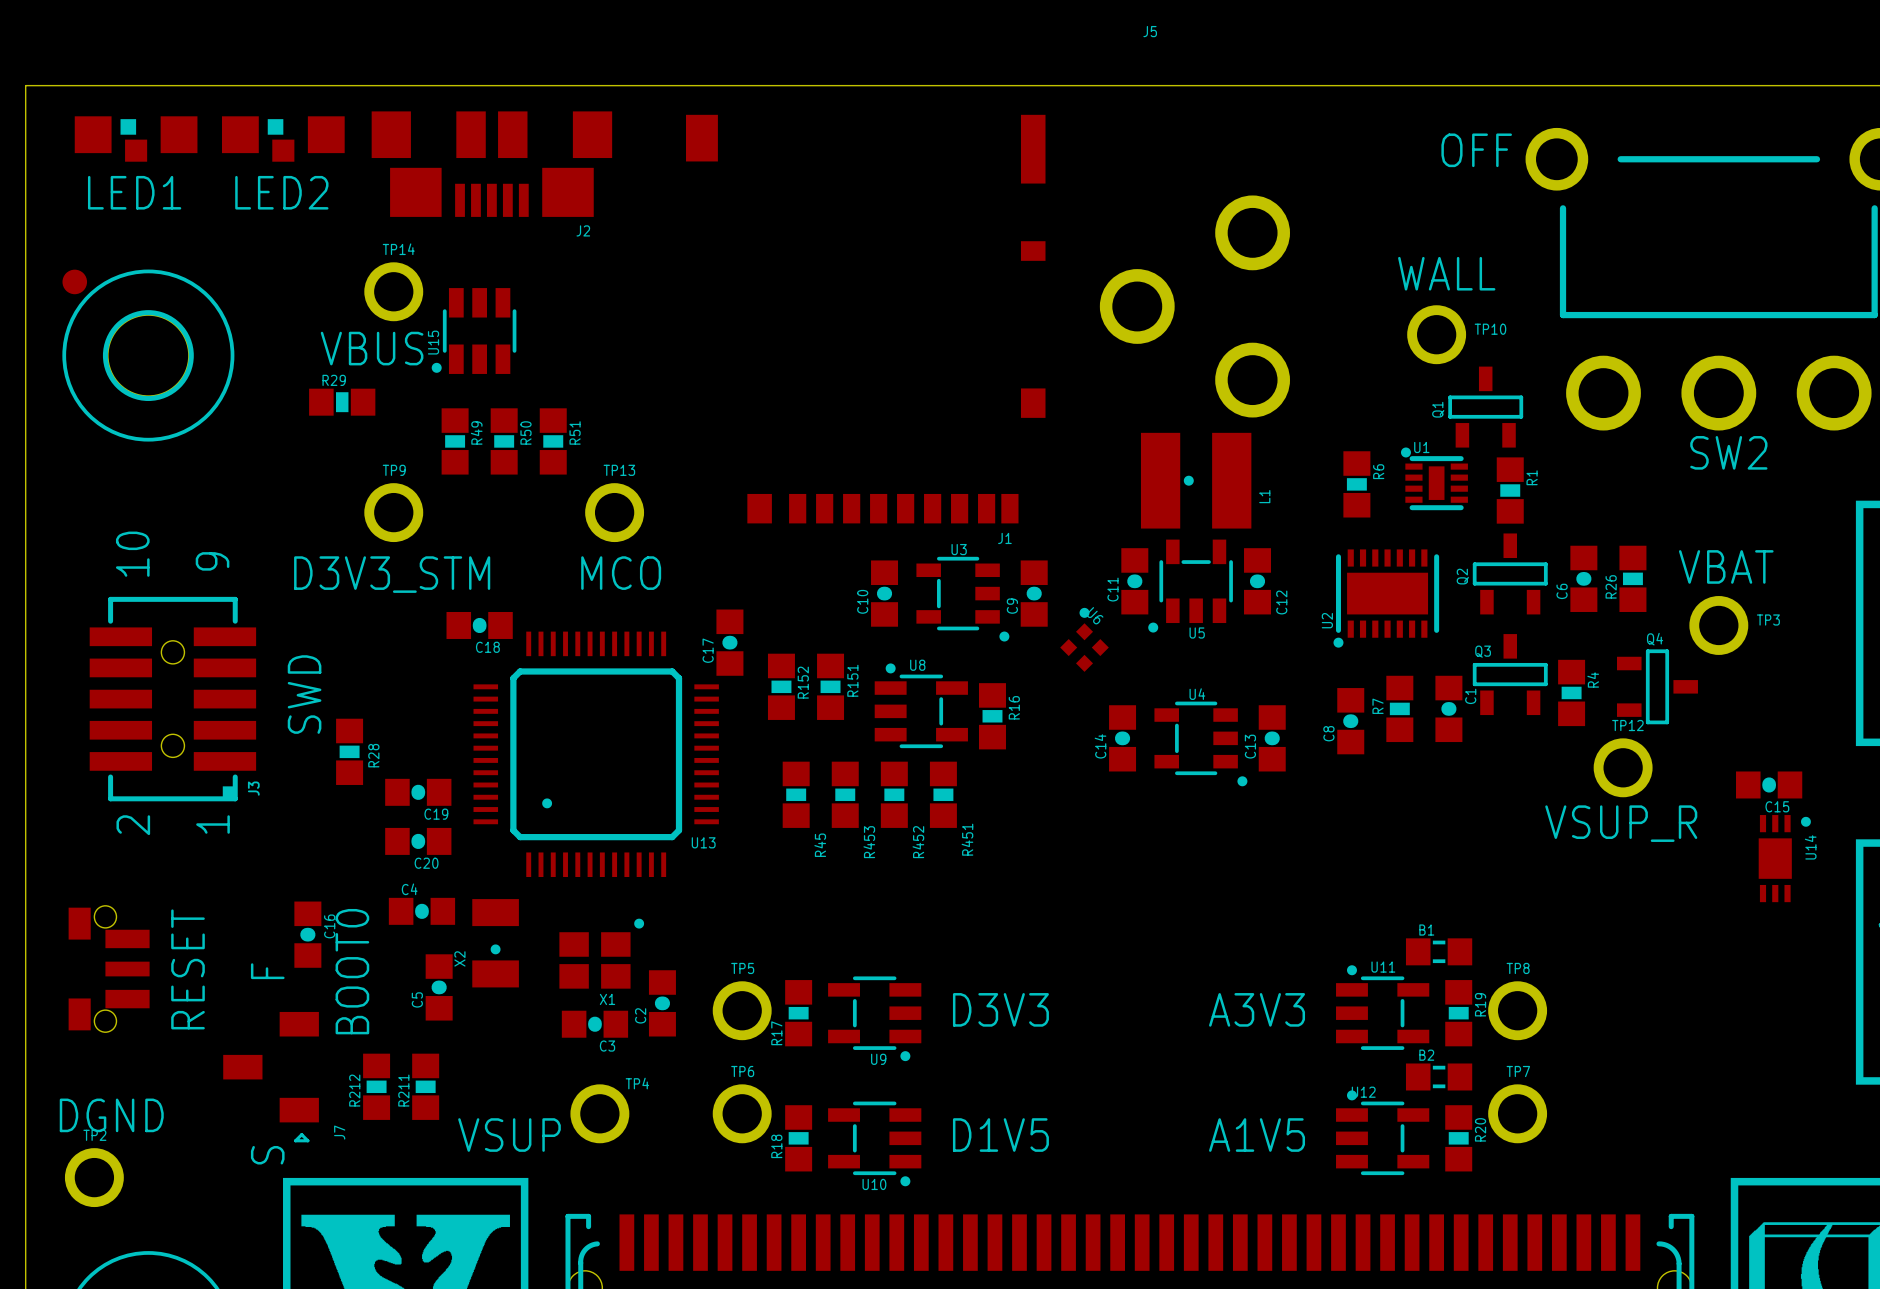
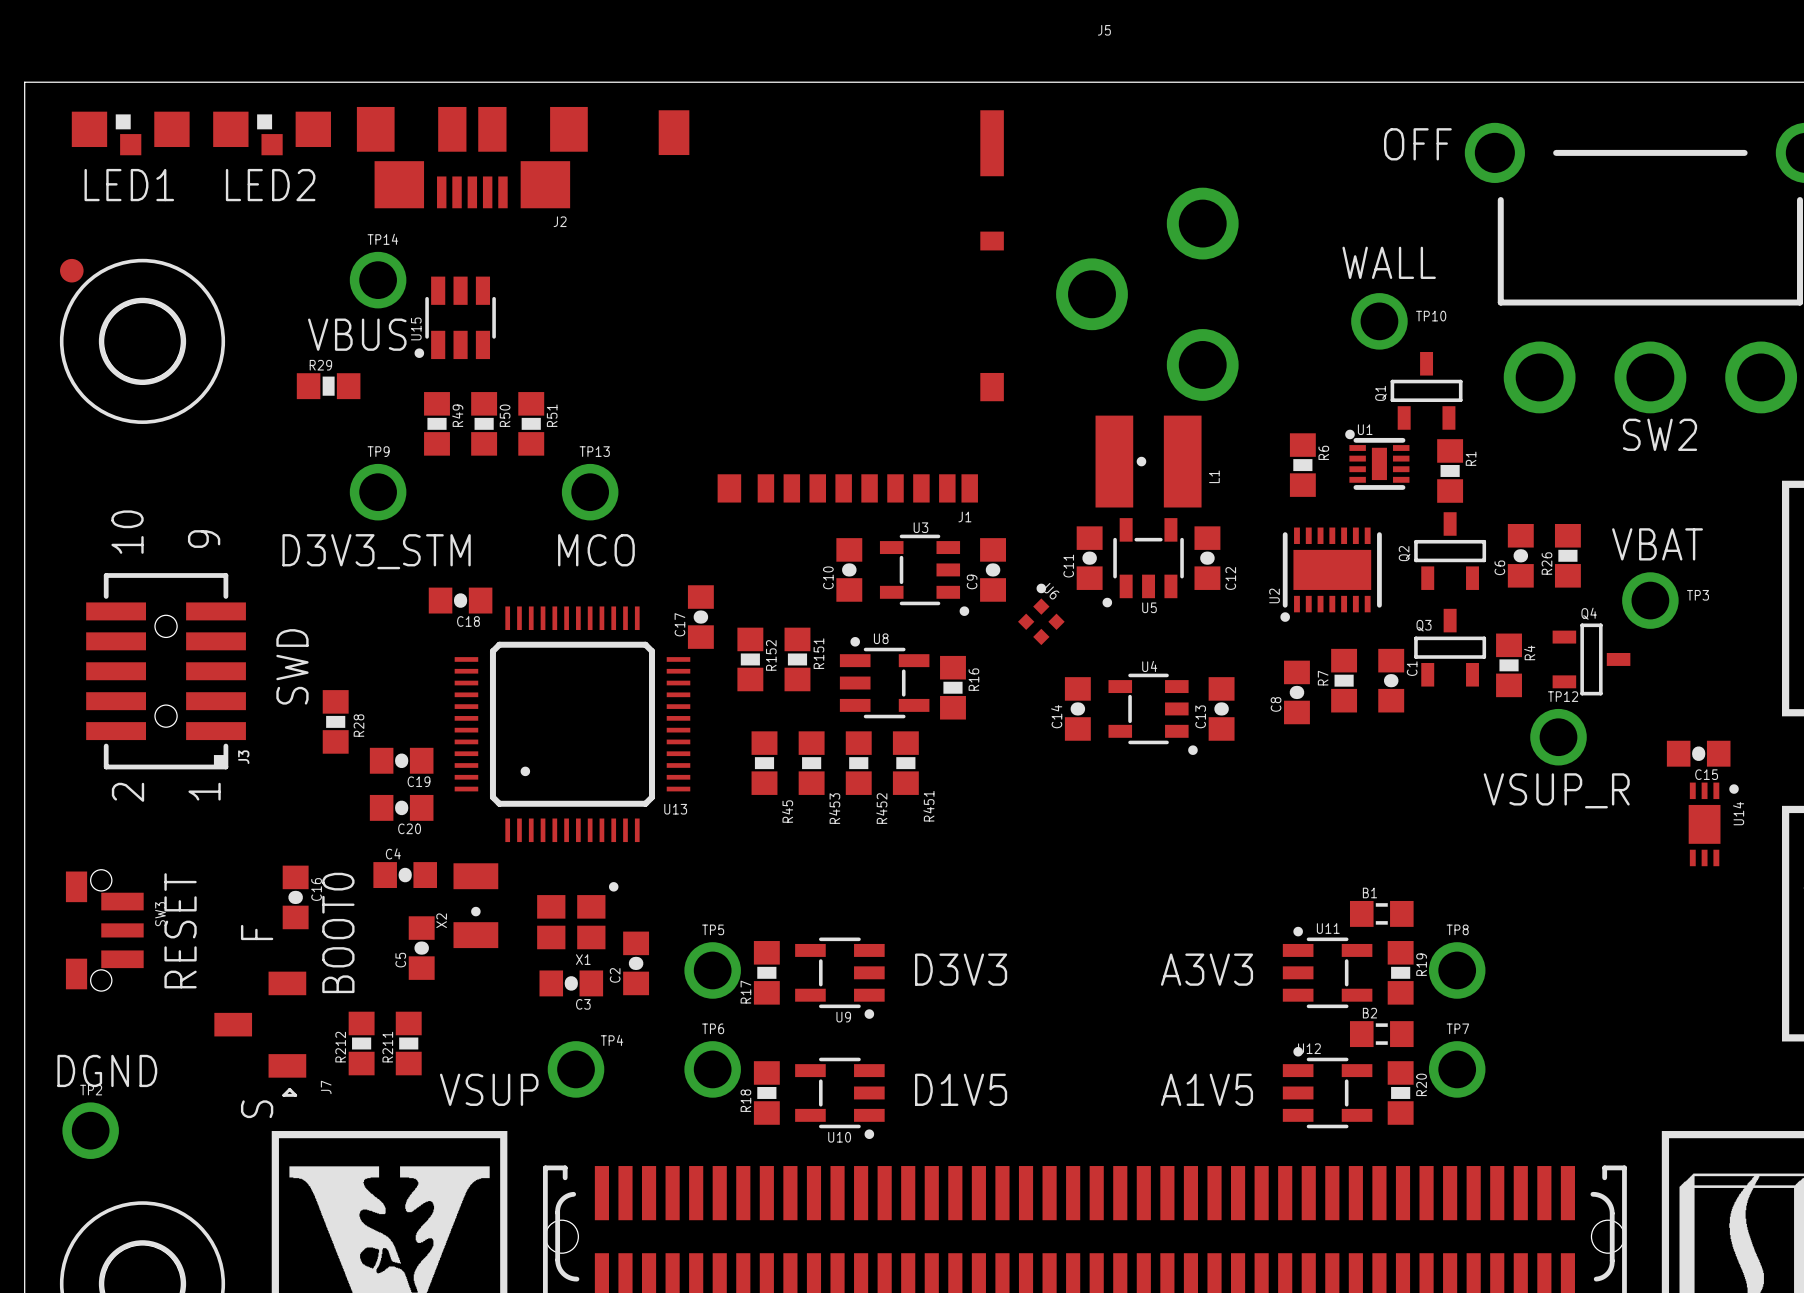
SW3 name: none -> SW3 (160, 914)

